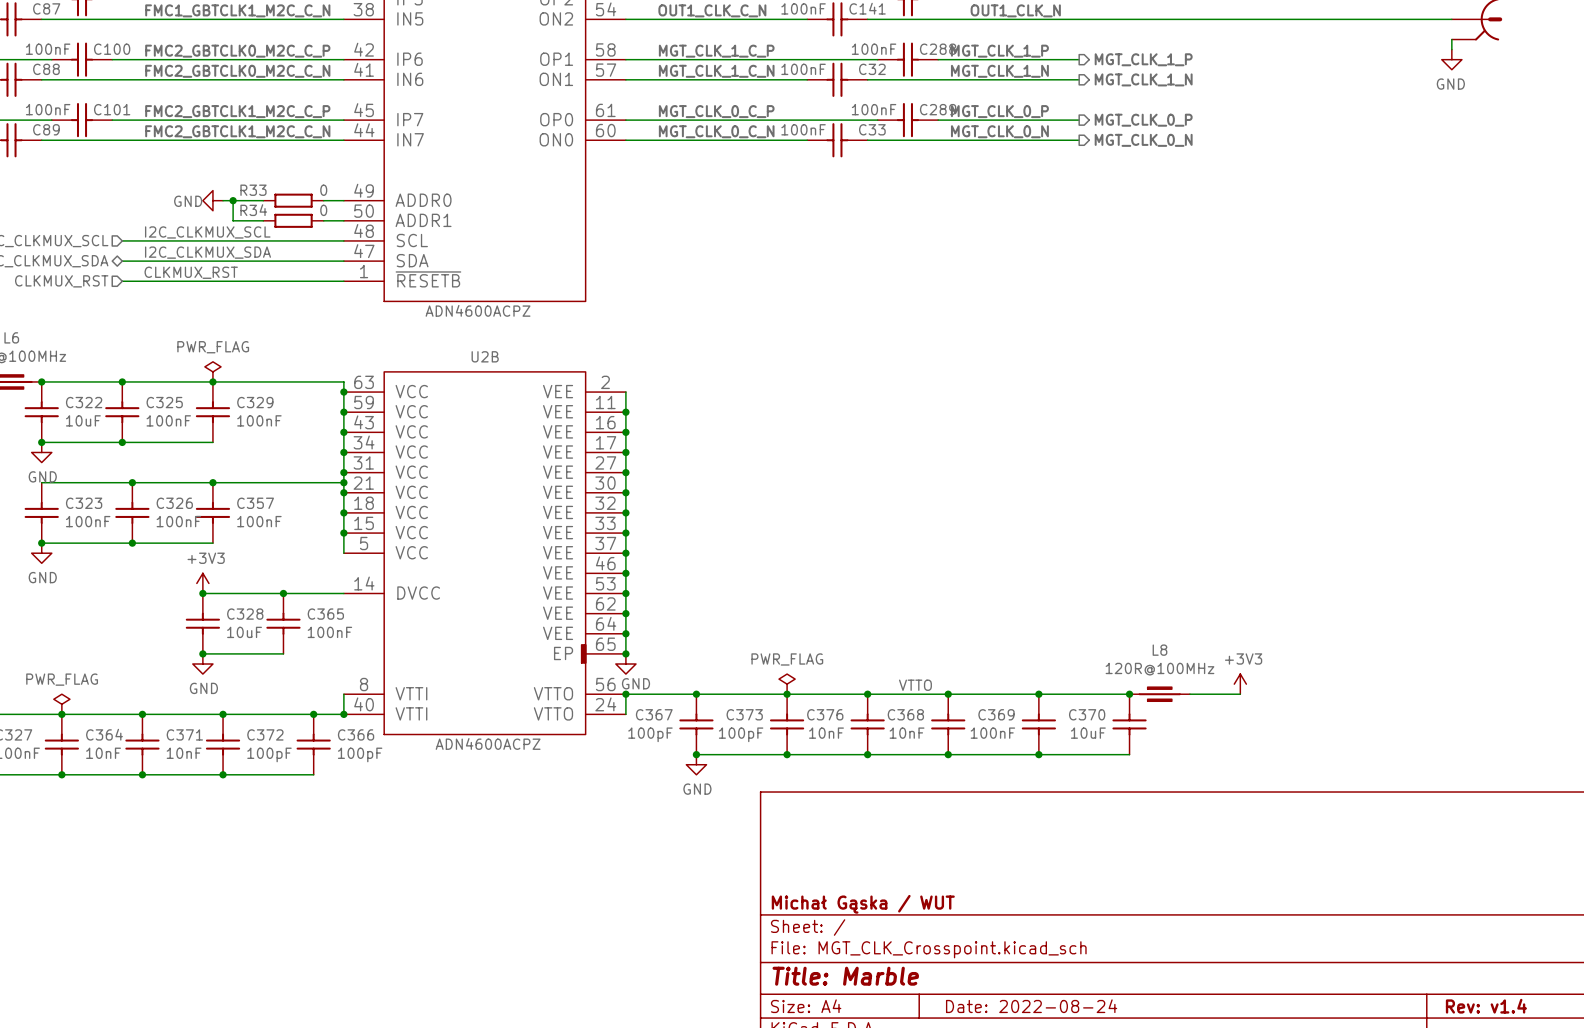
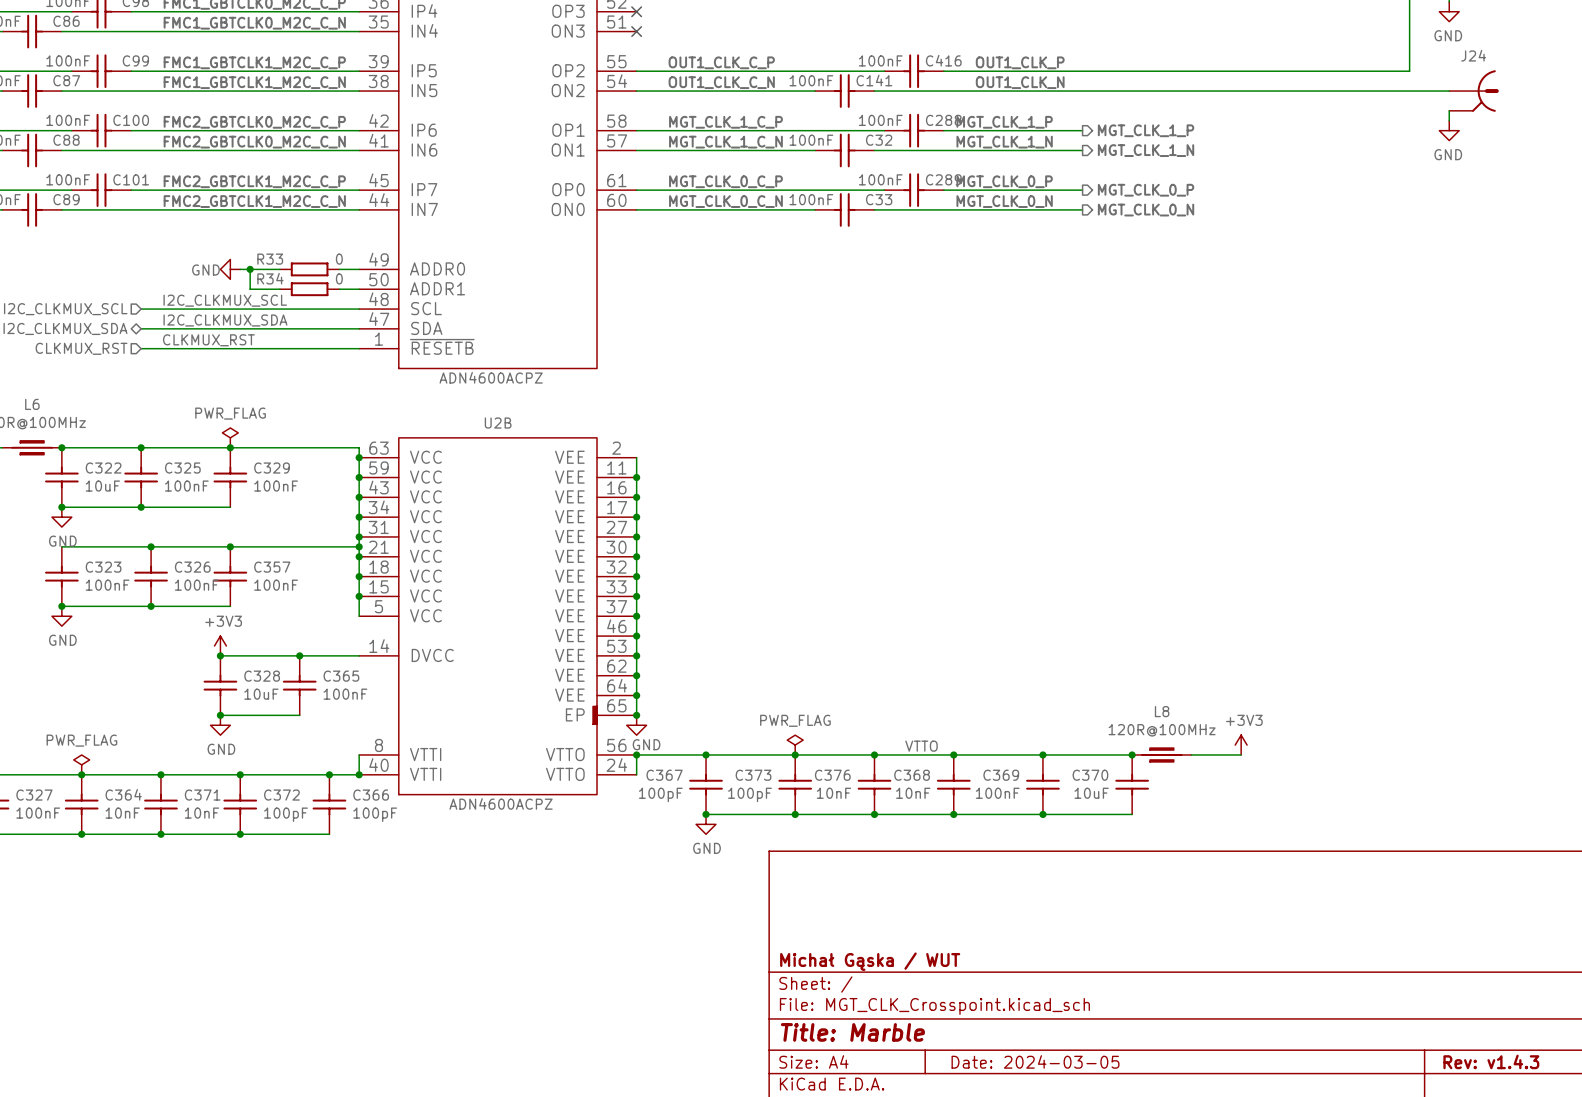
title block: Date: 2022-08-24 (1031, 1006) -> Date: 2024-03-05 (1035, 1061)
title block: Rev: v1.4 (1486, 1006) -> Rev: v1.4.3 (1491, 1061)

